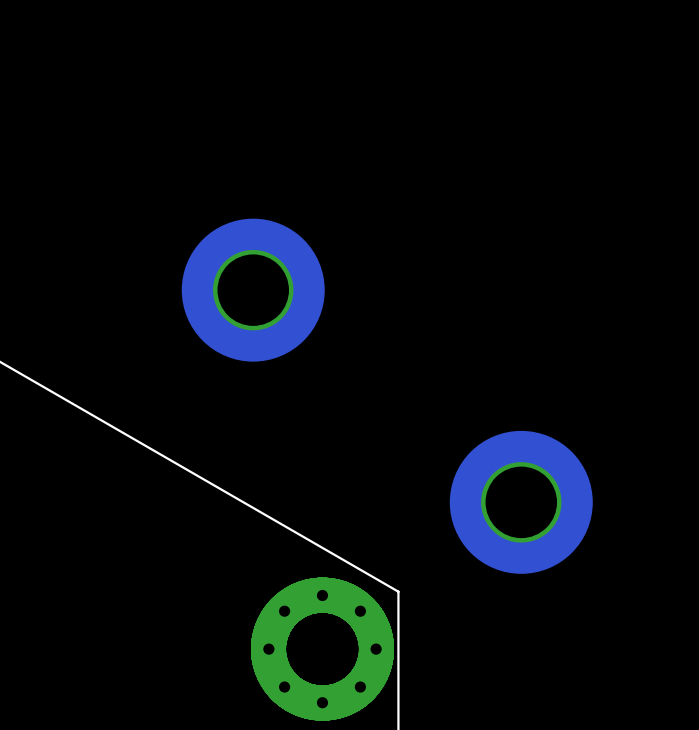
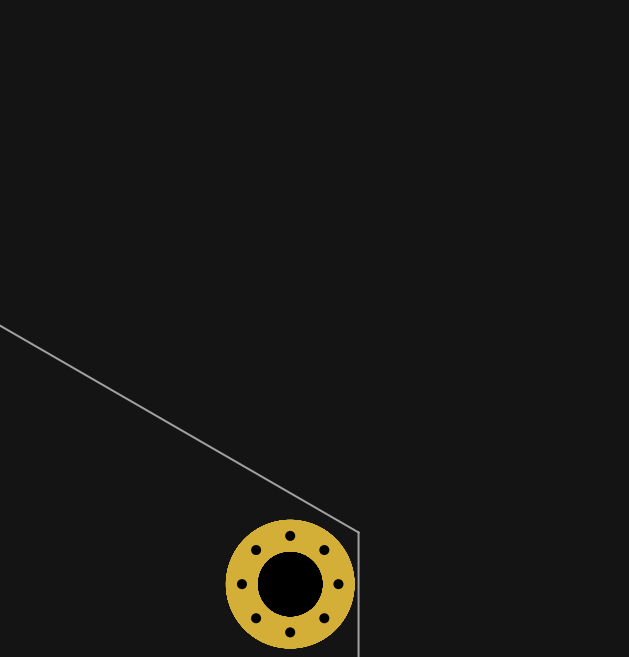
part: (253, 290) -> none
part: (521, 502) -> none

